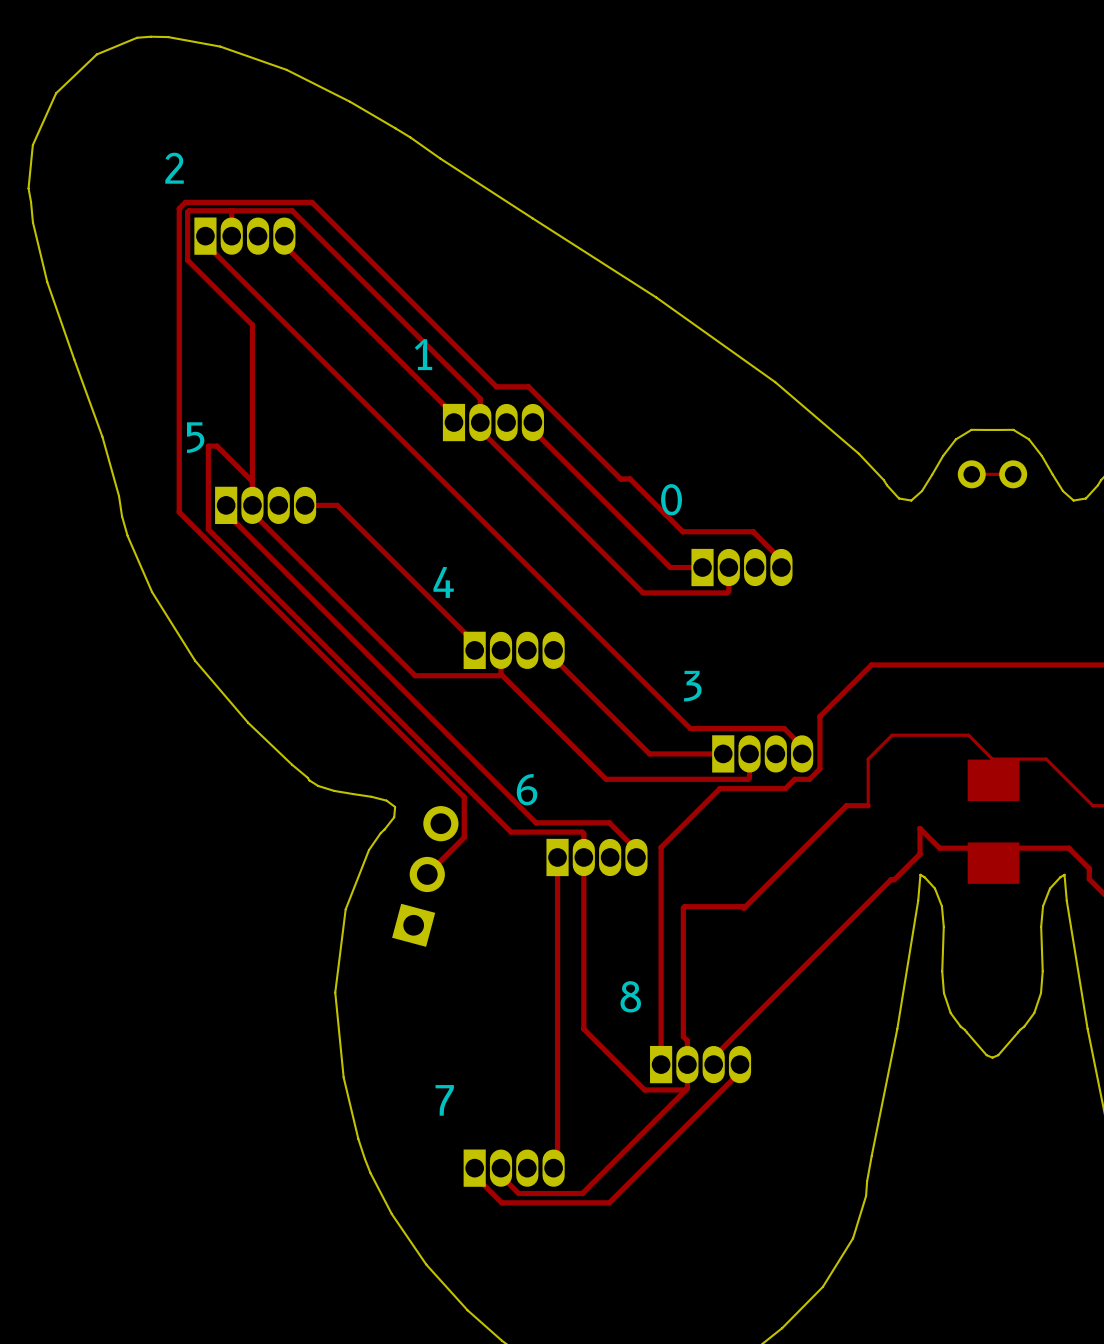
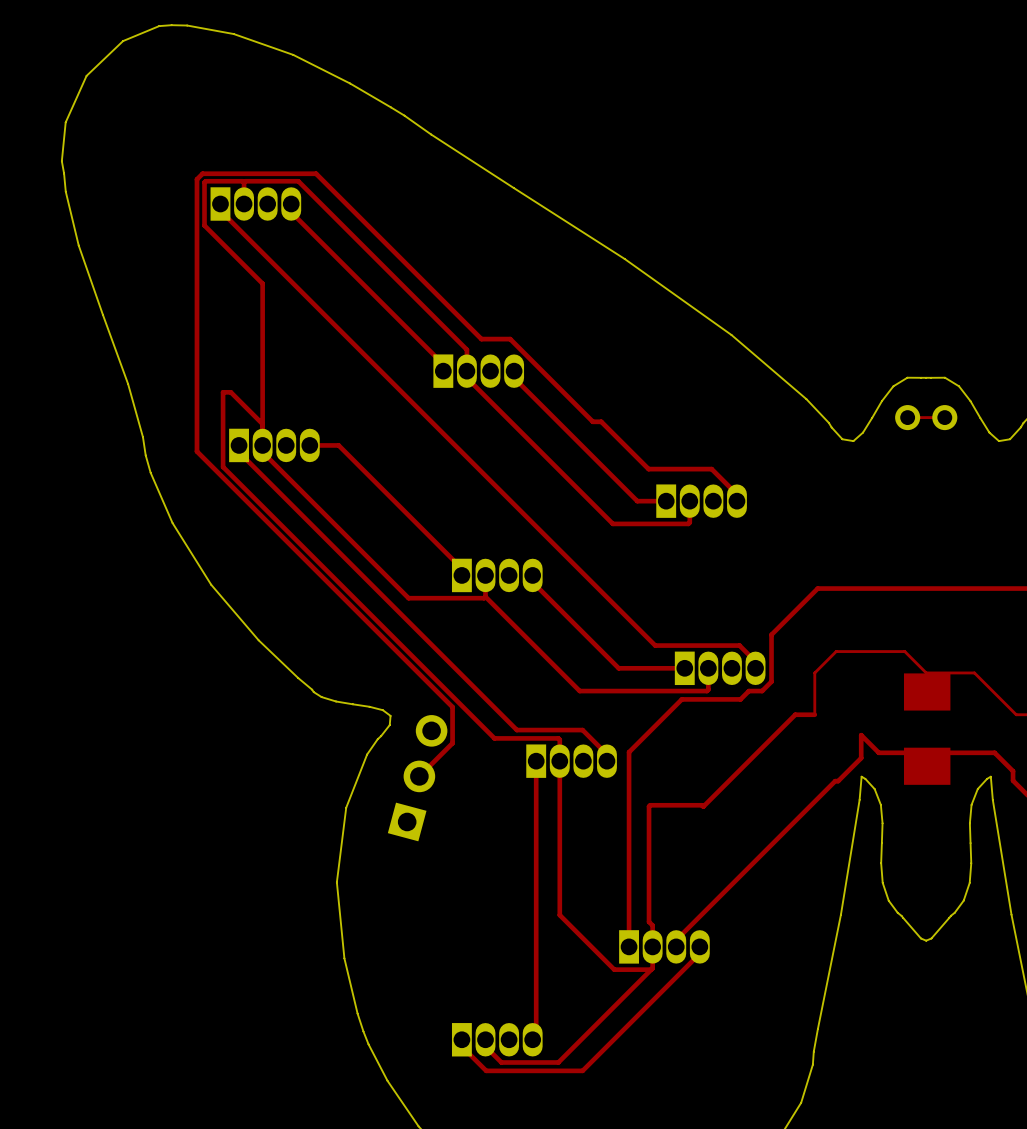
text: 2 (174, 168) -> none
text: 1 (423, 354) -> none
text: 5 (195, 437) -> none
text: 0 (671, 499) -> none
text: 4 (443, 582) -> none
text: 3 (692, 686) -> none
text: 6 (527, 789) -> none
text: 8 (630, 996) -> none
text: 7 (444, 1100) -> none

